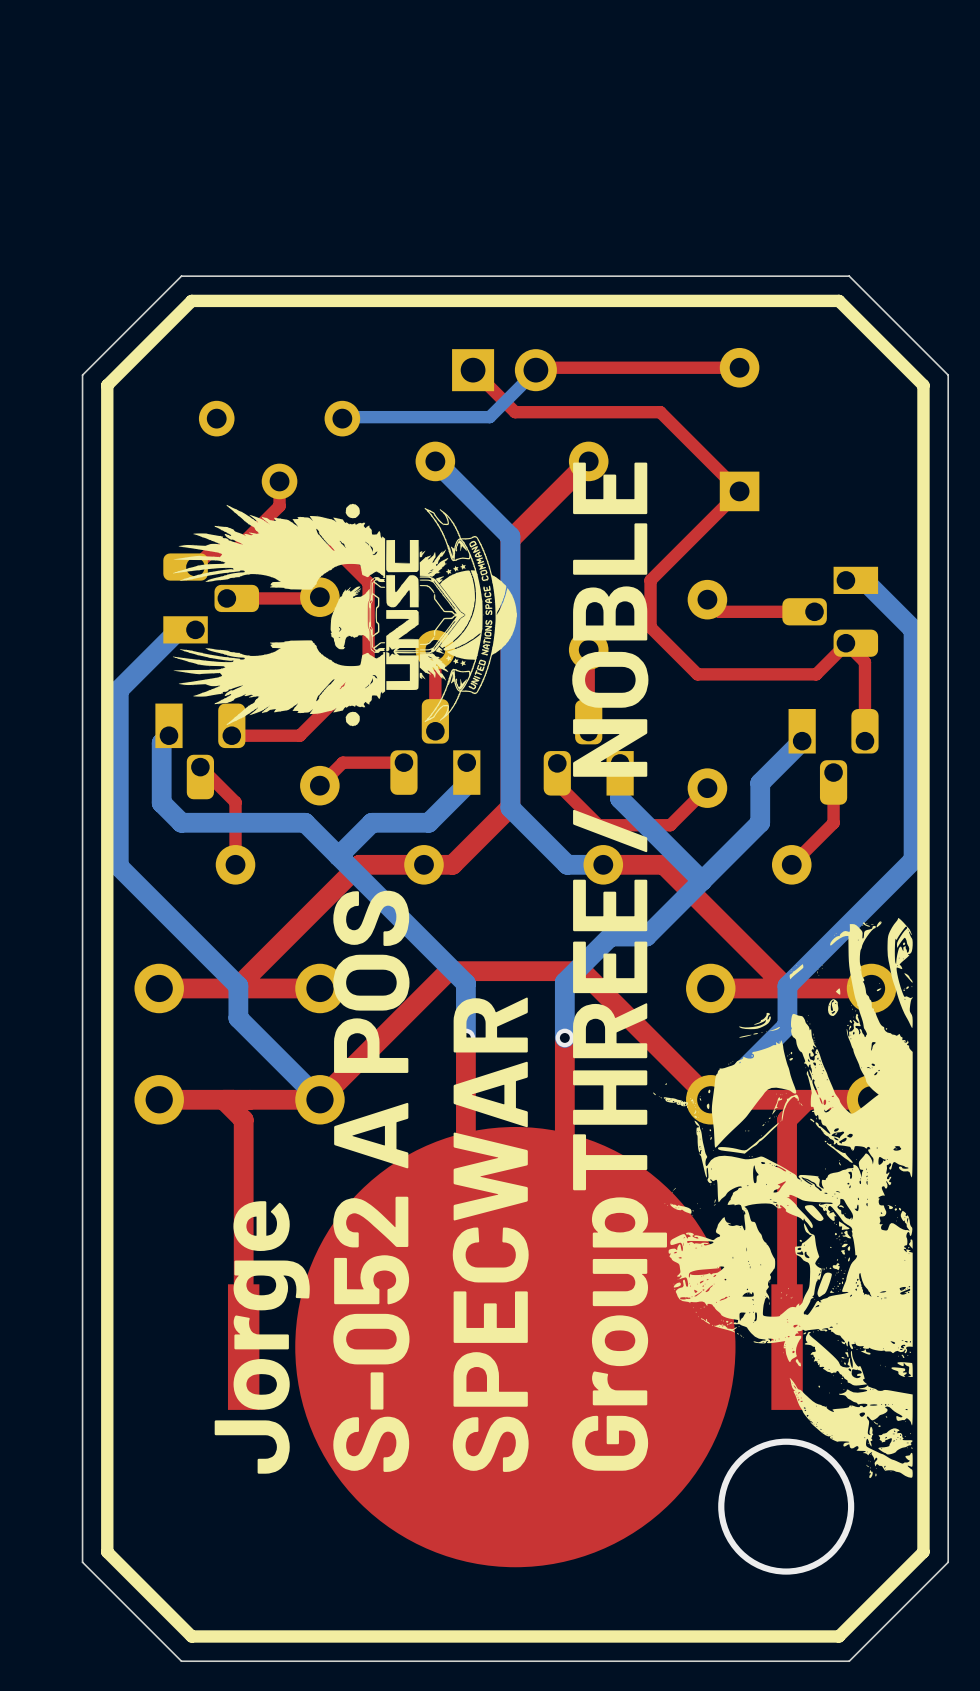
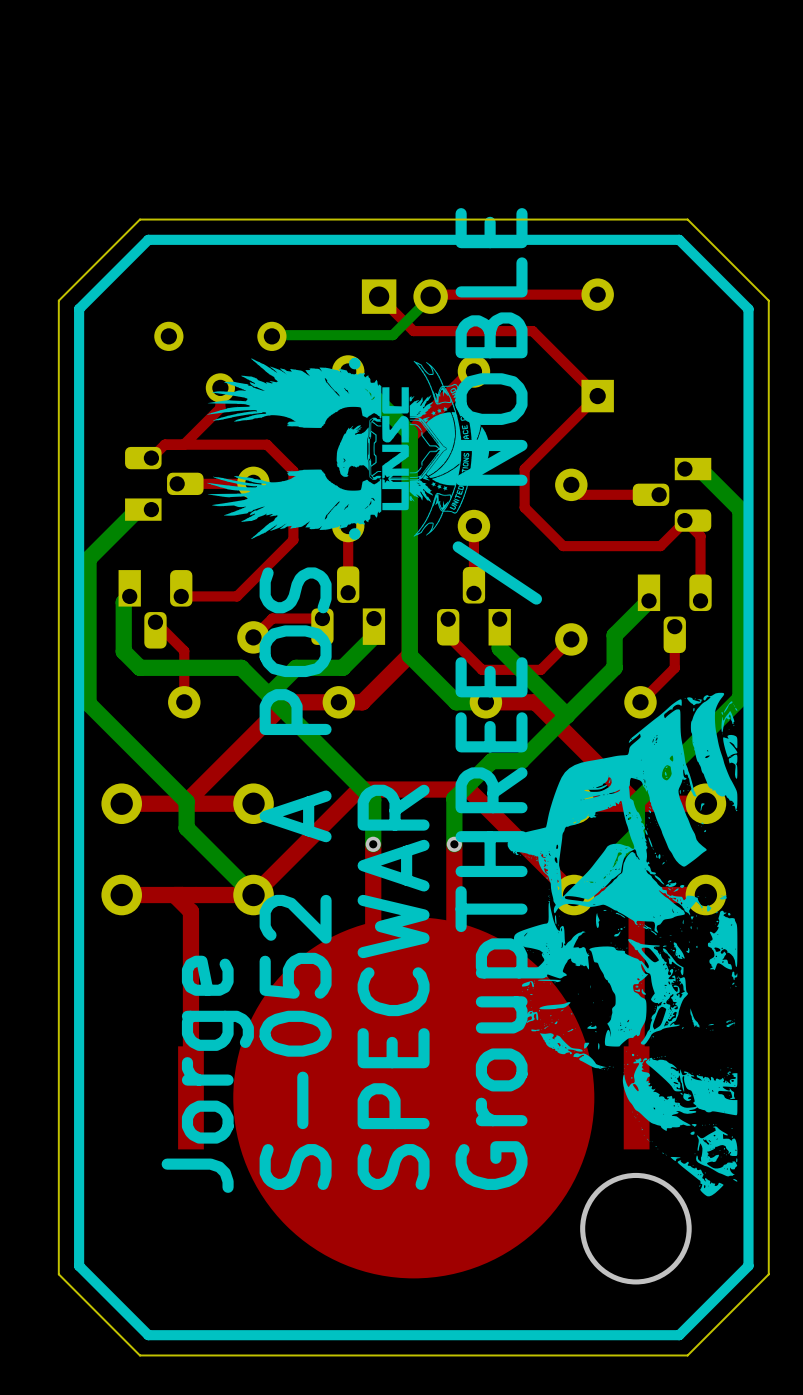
drawing position: (344, 615) -> (348, 448)
drawing: none -> [507, 692, 738, 1197]
drawing: [653, 917, 913, 1479] -> none

